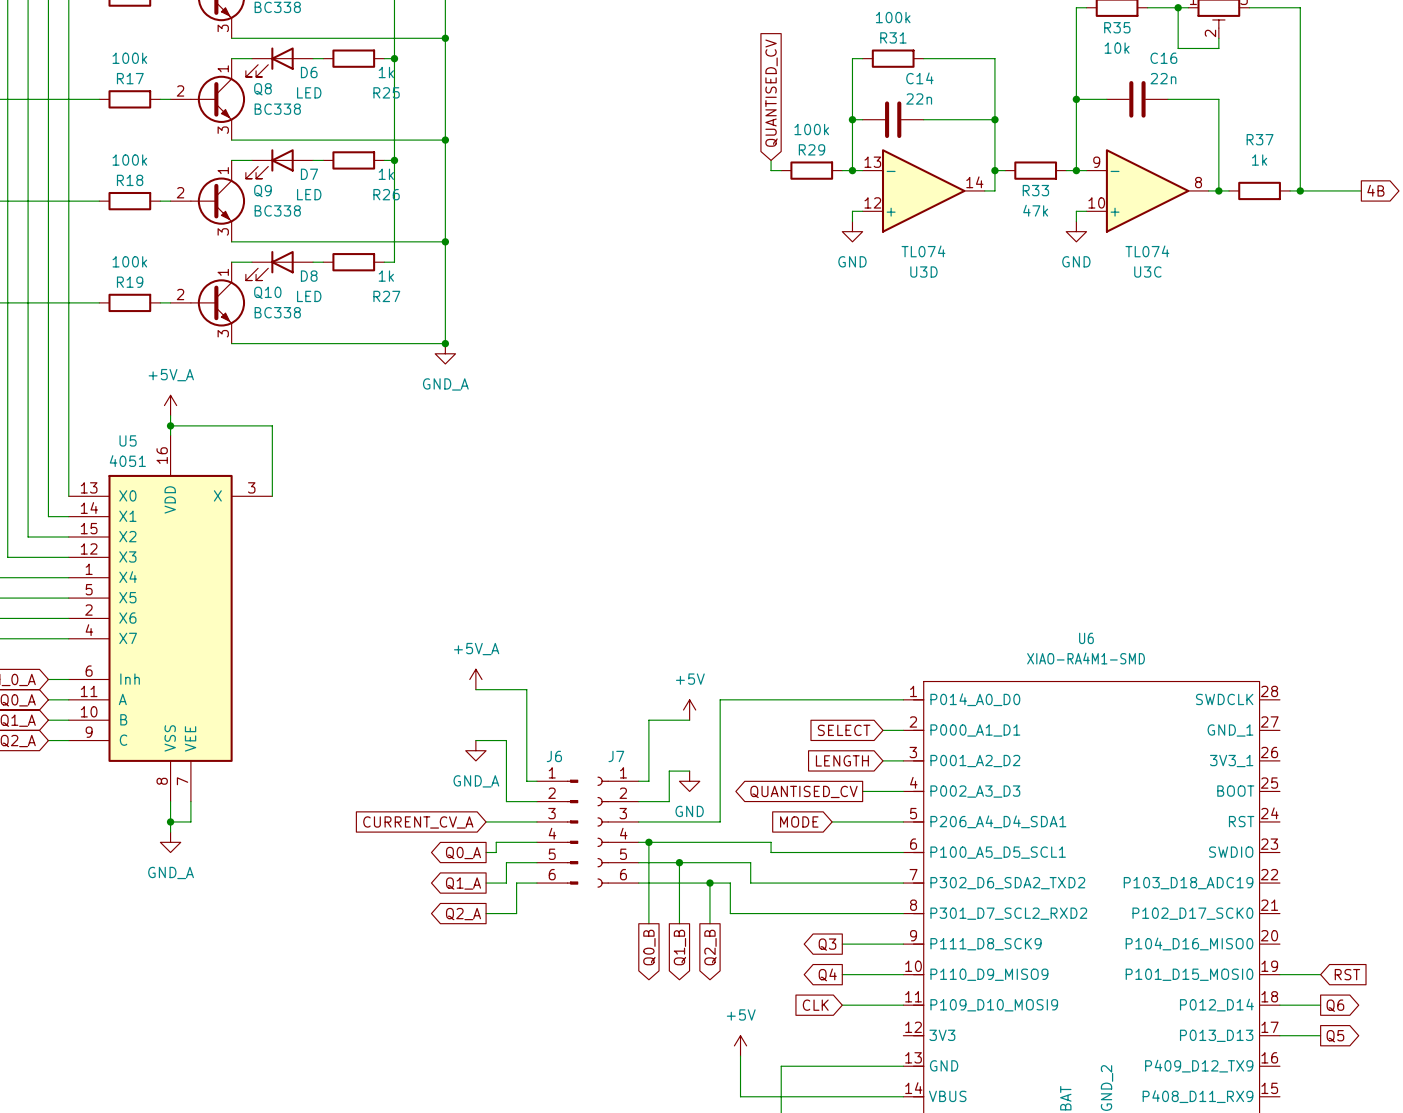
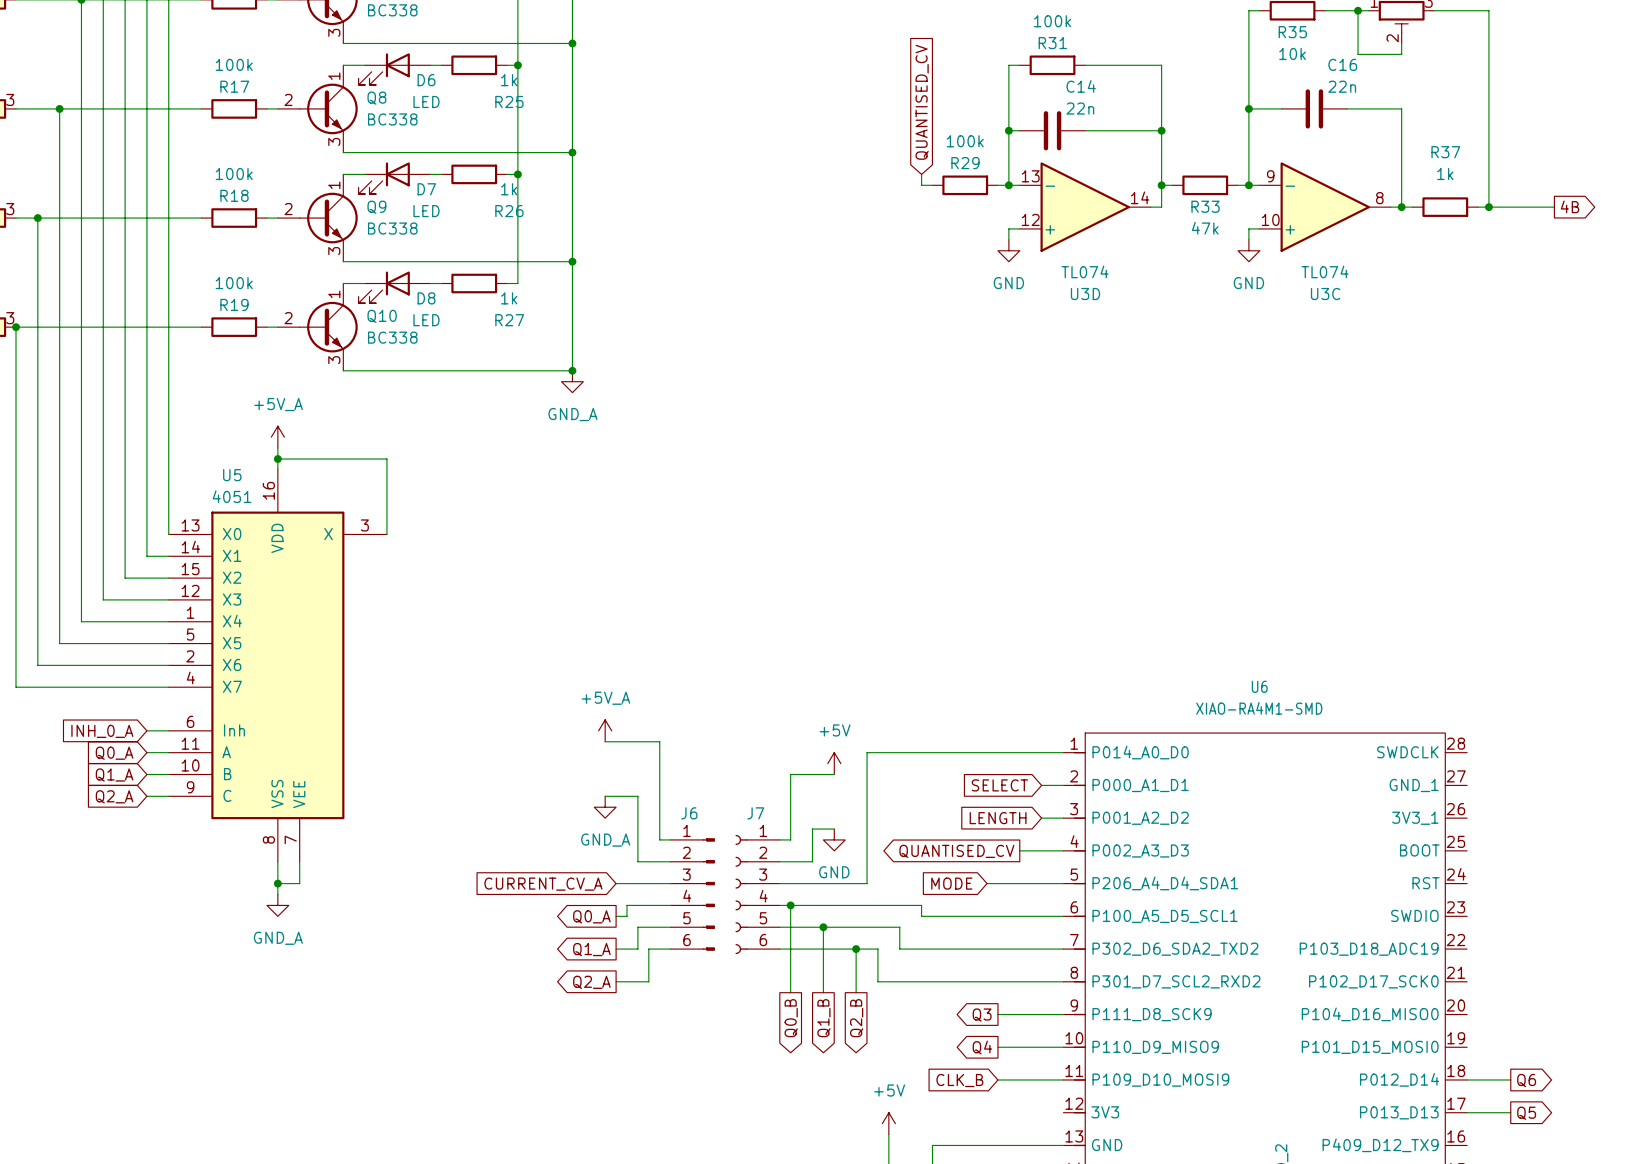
wire: (1279, 974) (1320, 974) -> none
global label: RST (1347, 974) -> none
global label: CLK (815, 1005) -> CLK_B (959, 1080)

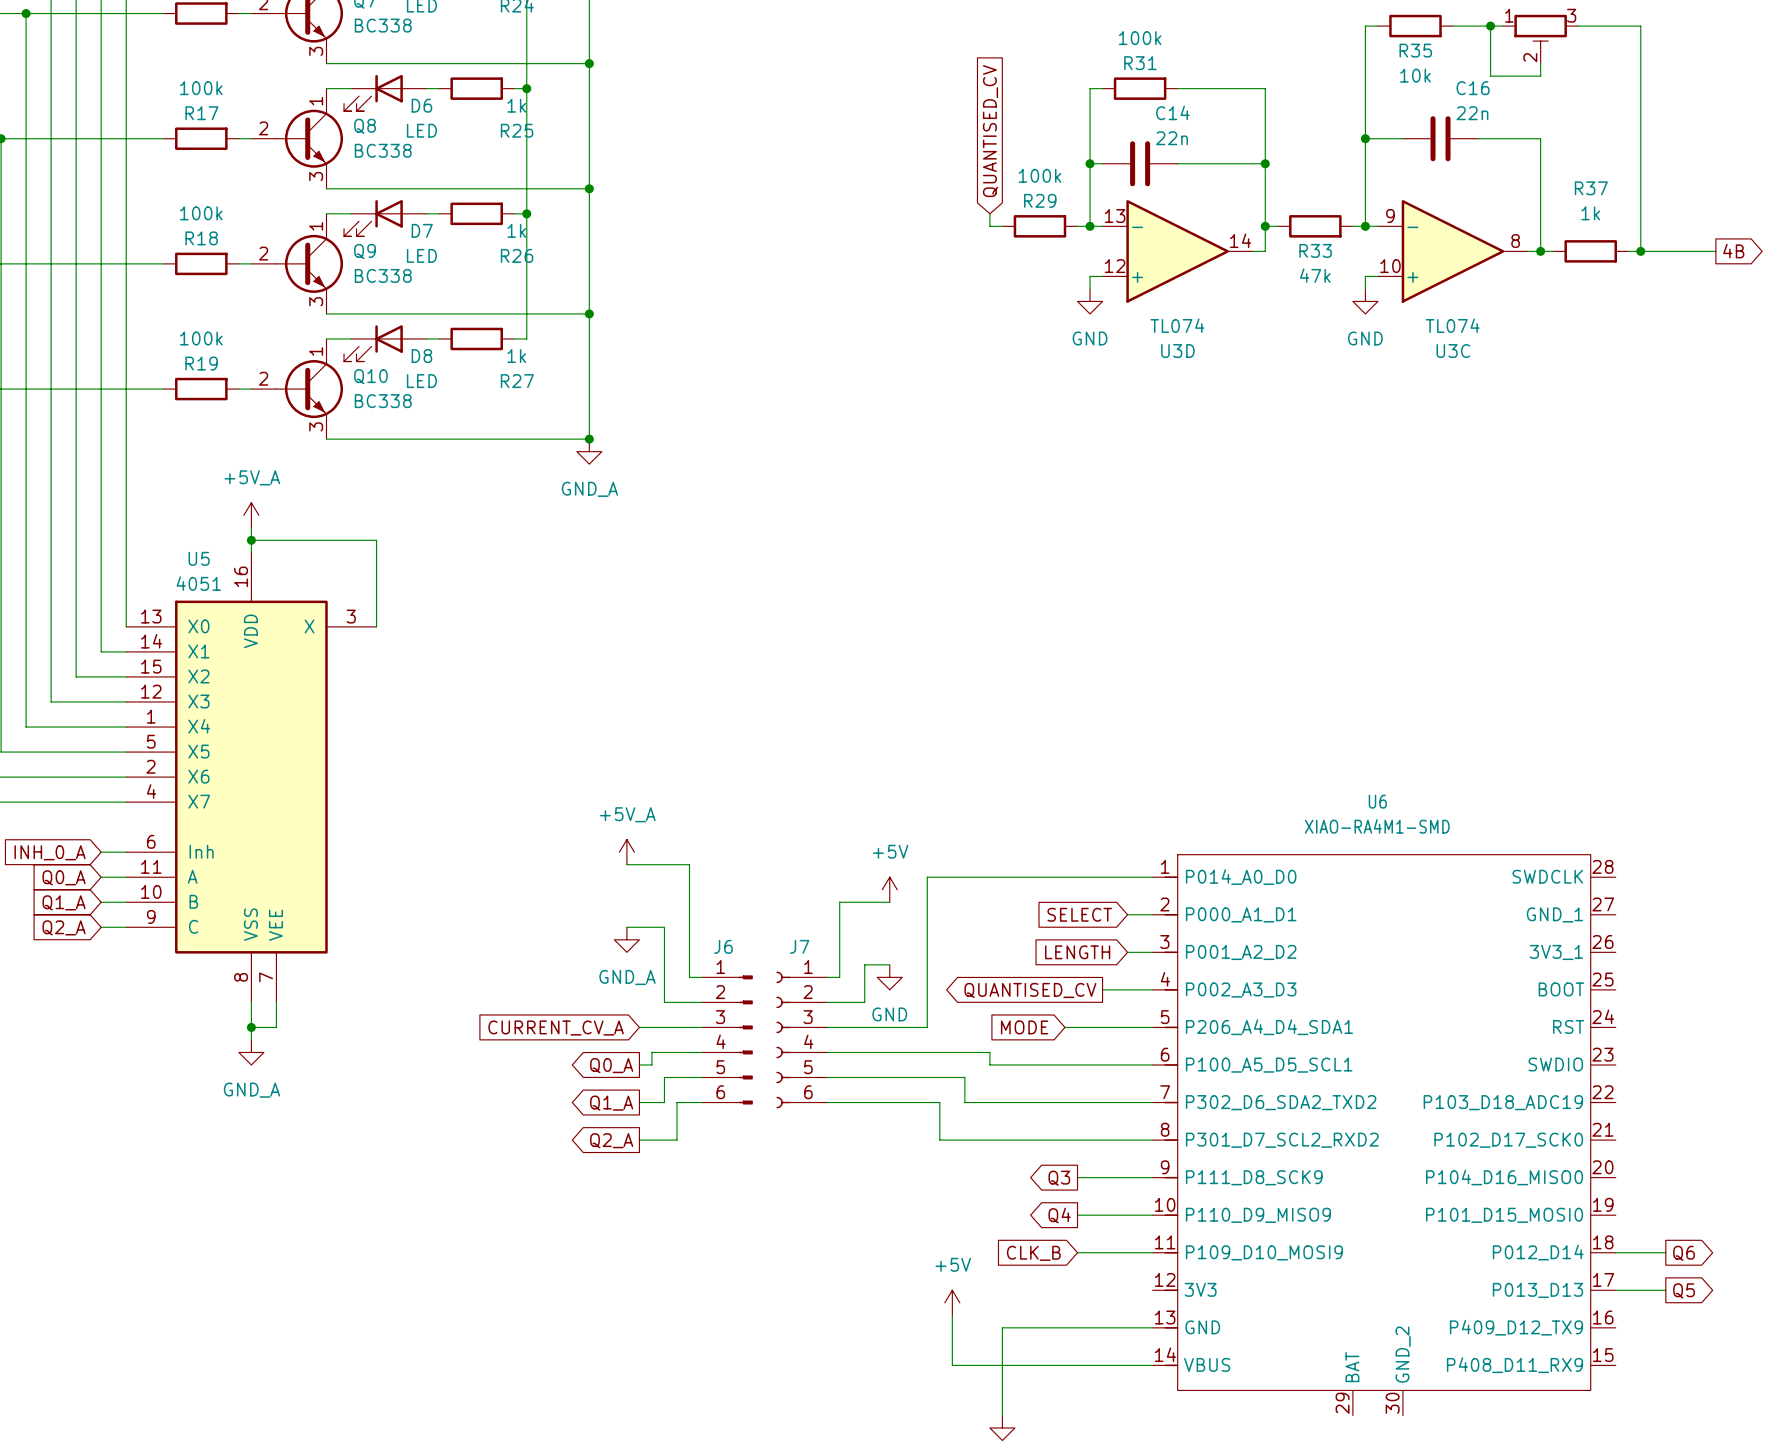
wire: (790, 905) (790, 992) -> none
junction: (790, 905) -> none
wire: (823, 927) (823, 992) -> none
junction: (823, 927) -> none
wire: (856, 949) (856, 992) -> none
junction: (856, 949) -> none
global label: Q0_B (791, 1018) -> none
global label: Q1_B (823, 1018) -> none
global label: Q2_B (856, 1018) -> none

